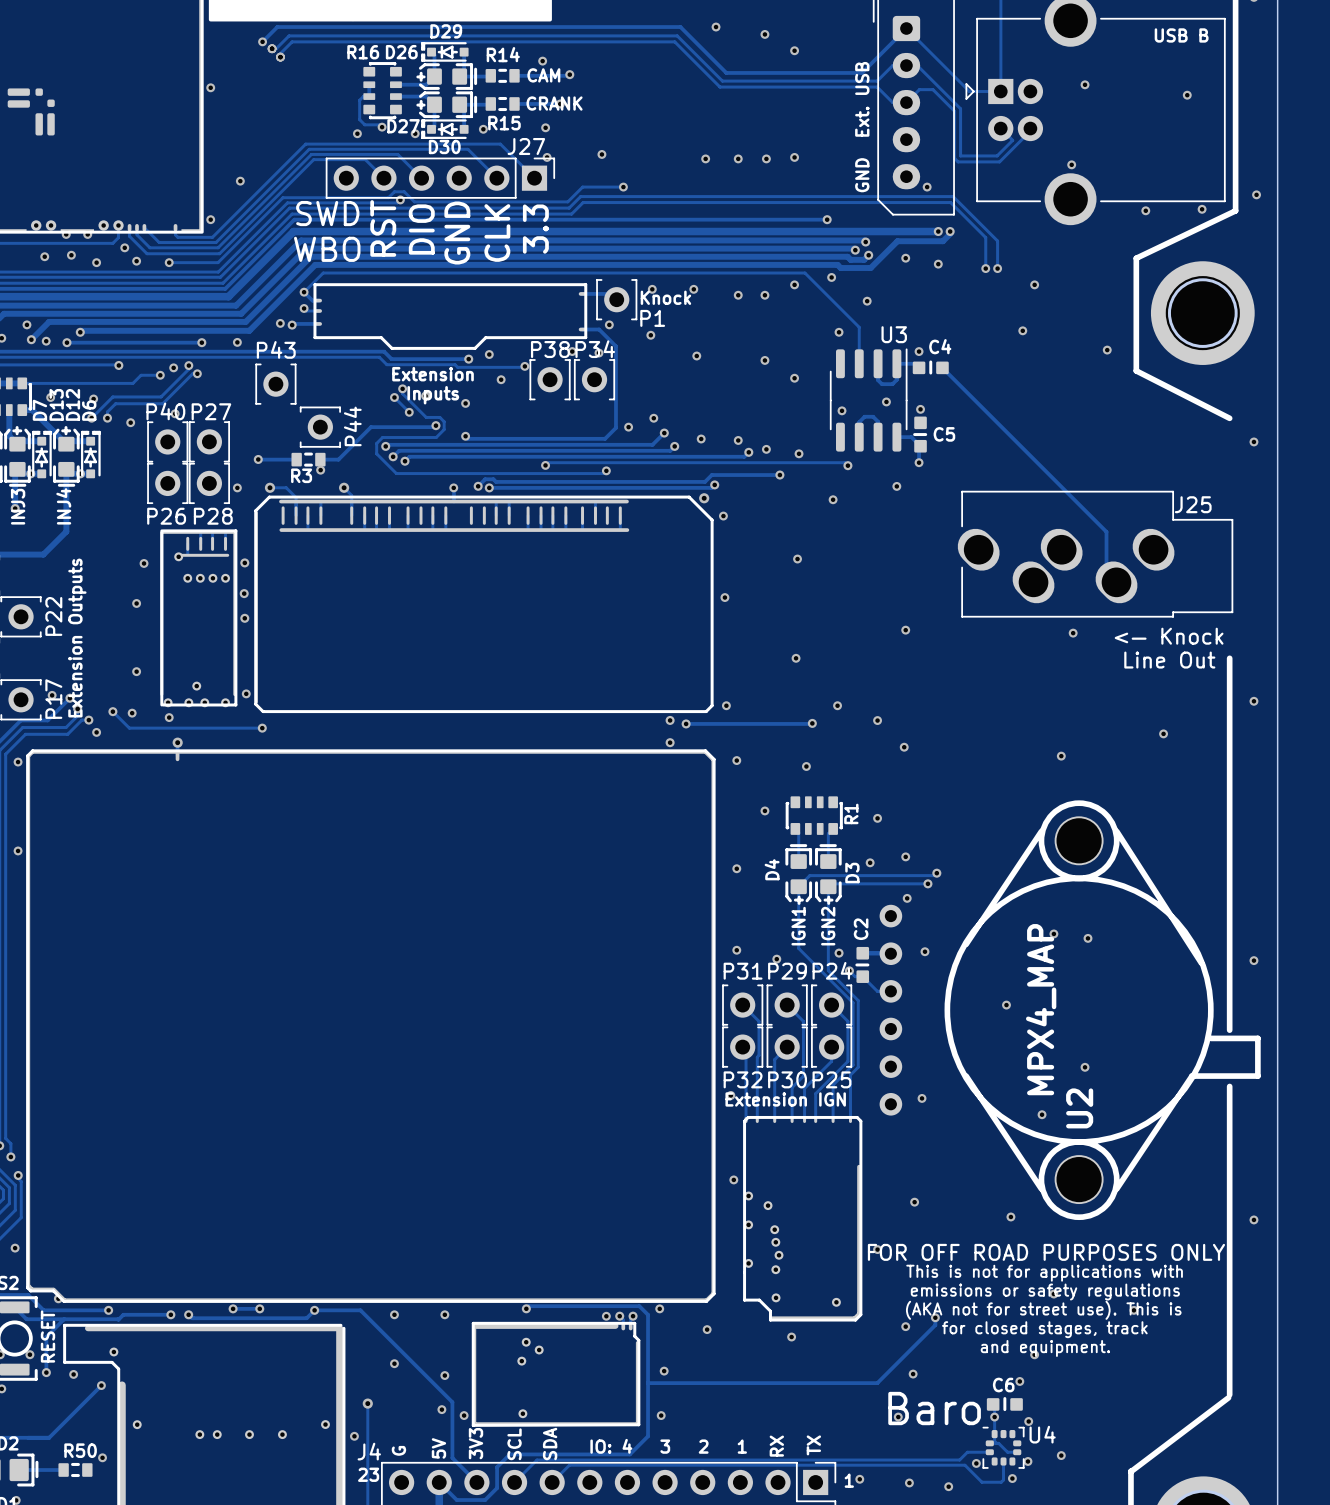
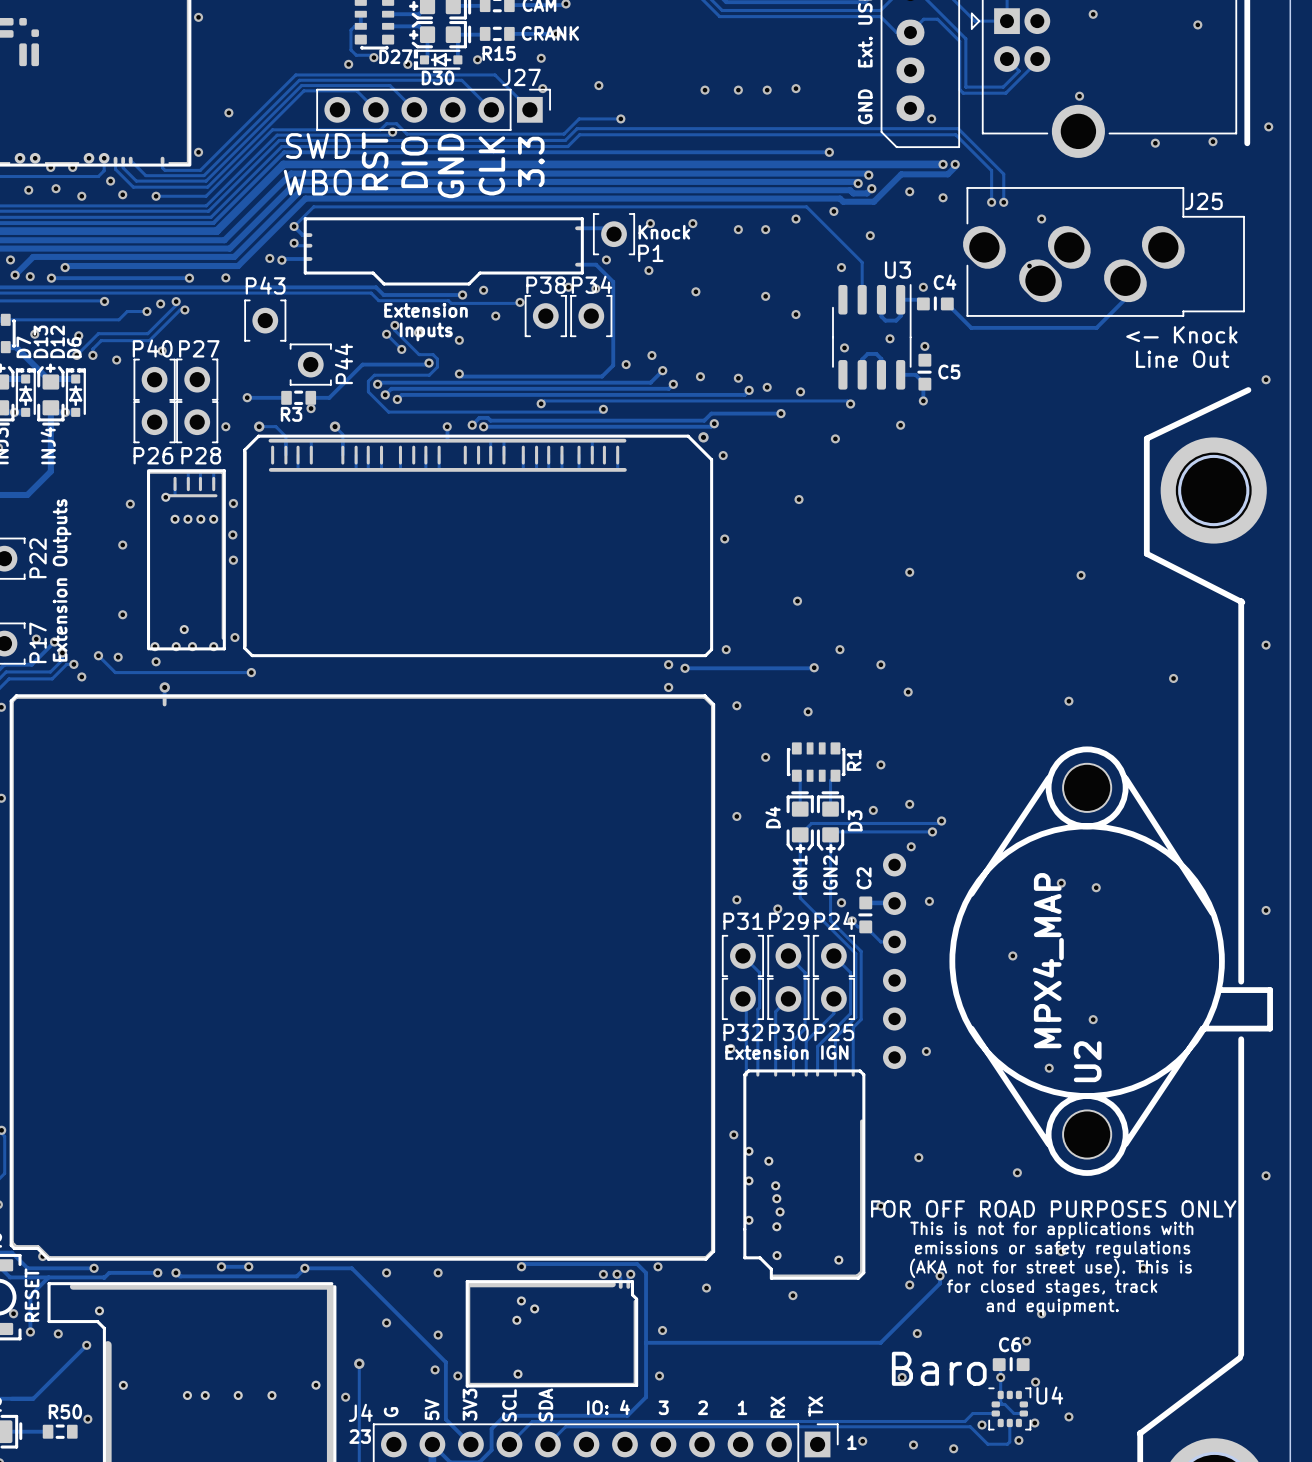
line: (1235, 210) (1136, 258) (1136, 370) (1229, 418) -> (1248, 390) (1146, 438) (1146, 553) (1242, 602)
part position: (1202, 313) -> (1213, 490)
round board edge position: (1202, 313) -> (1213, 490)
via: (1107, 350) -> none
track: (965, 391) (1106, 531) (1106, 582) -> (971, 327) (1096, 327) (1125, 299) (1125, 280)
J25 position: (1095, 554) -> (1103, 251)
text position: <— Knock (1169, 636) -> <— Knock (1181, 334)
text position: Line Out (1169, 660) -> Line Out (1182, 359)

